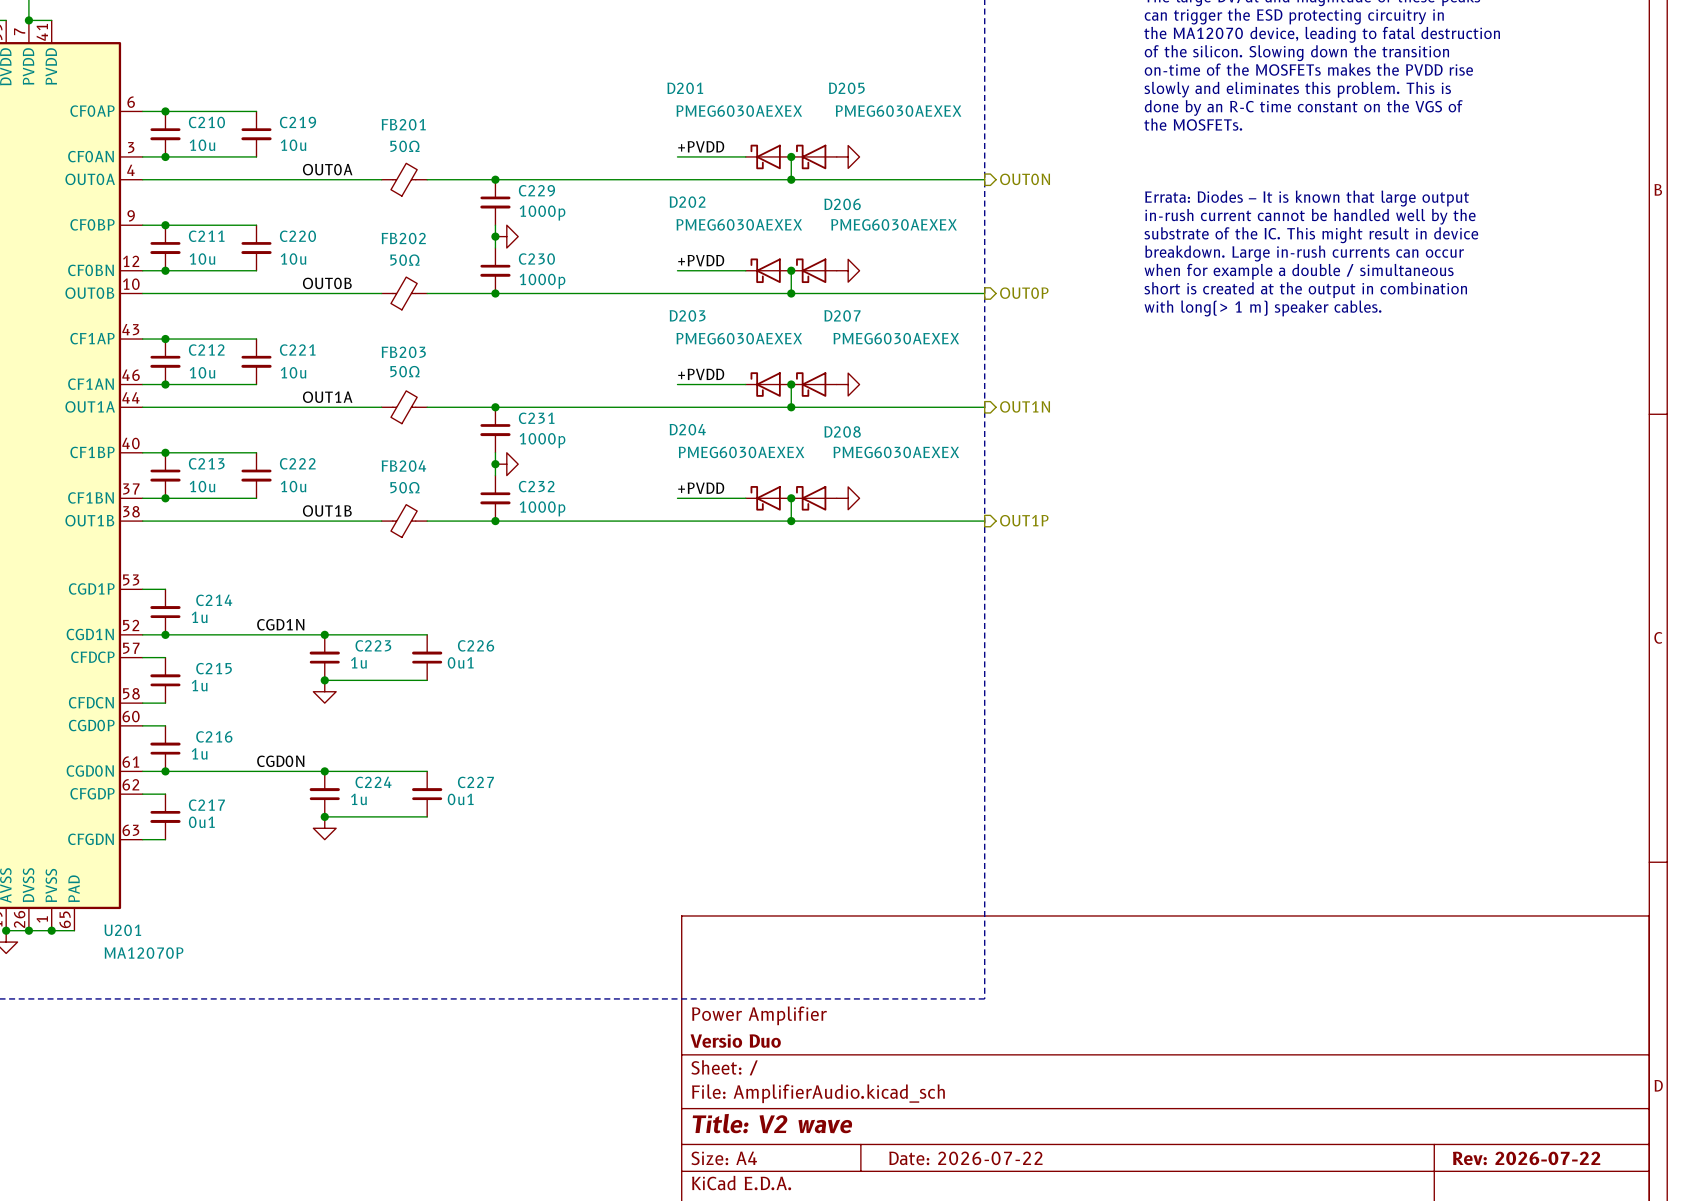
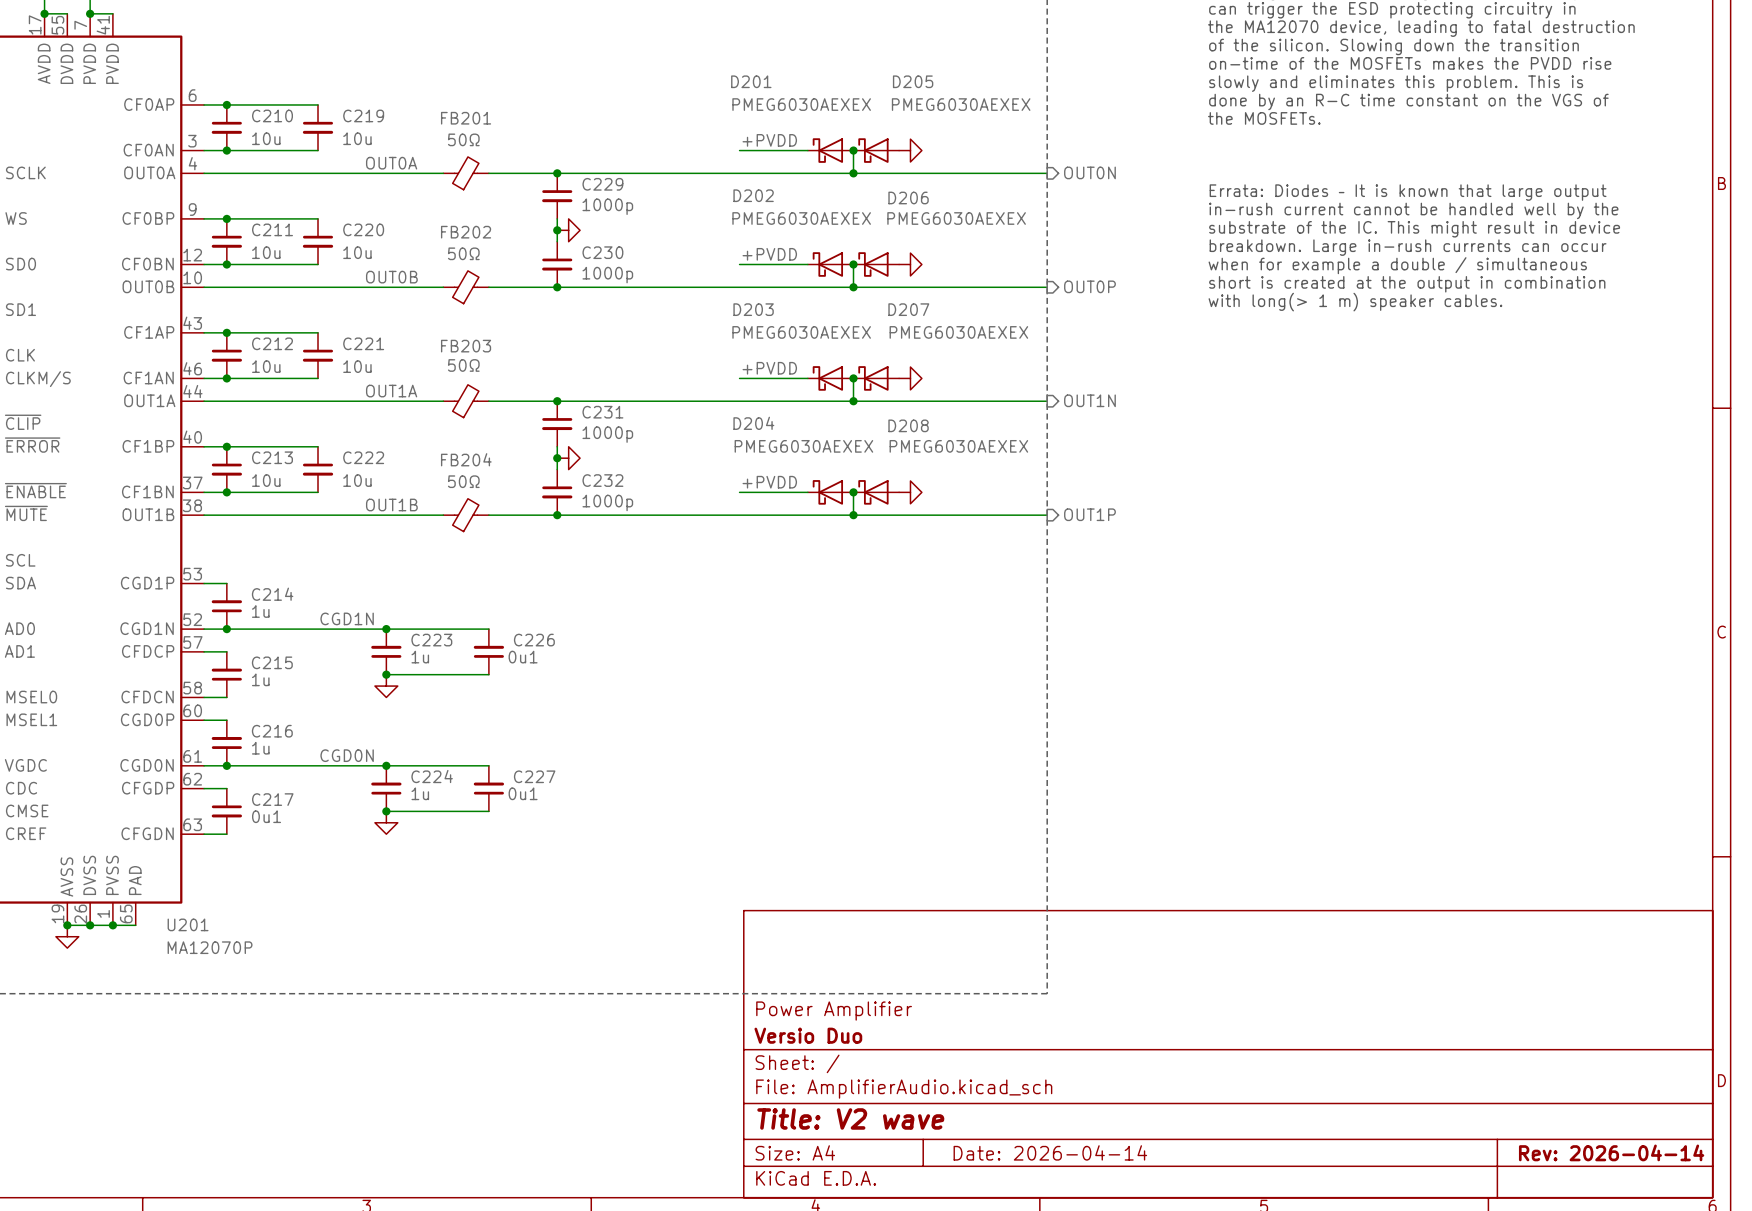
title block: Date: 2026-07-22 (965, 1158) -> Date: 2026-04-14 (1050, 1152)
title block: Rev: 2026-07-22 (1526, 1158) -> Rev: 2026-04-14 (1611, 1152)

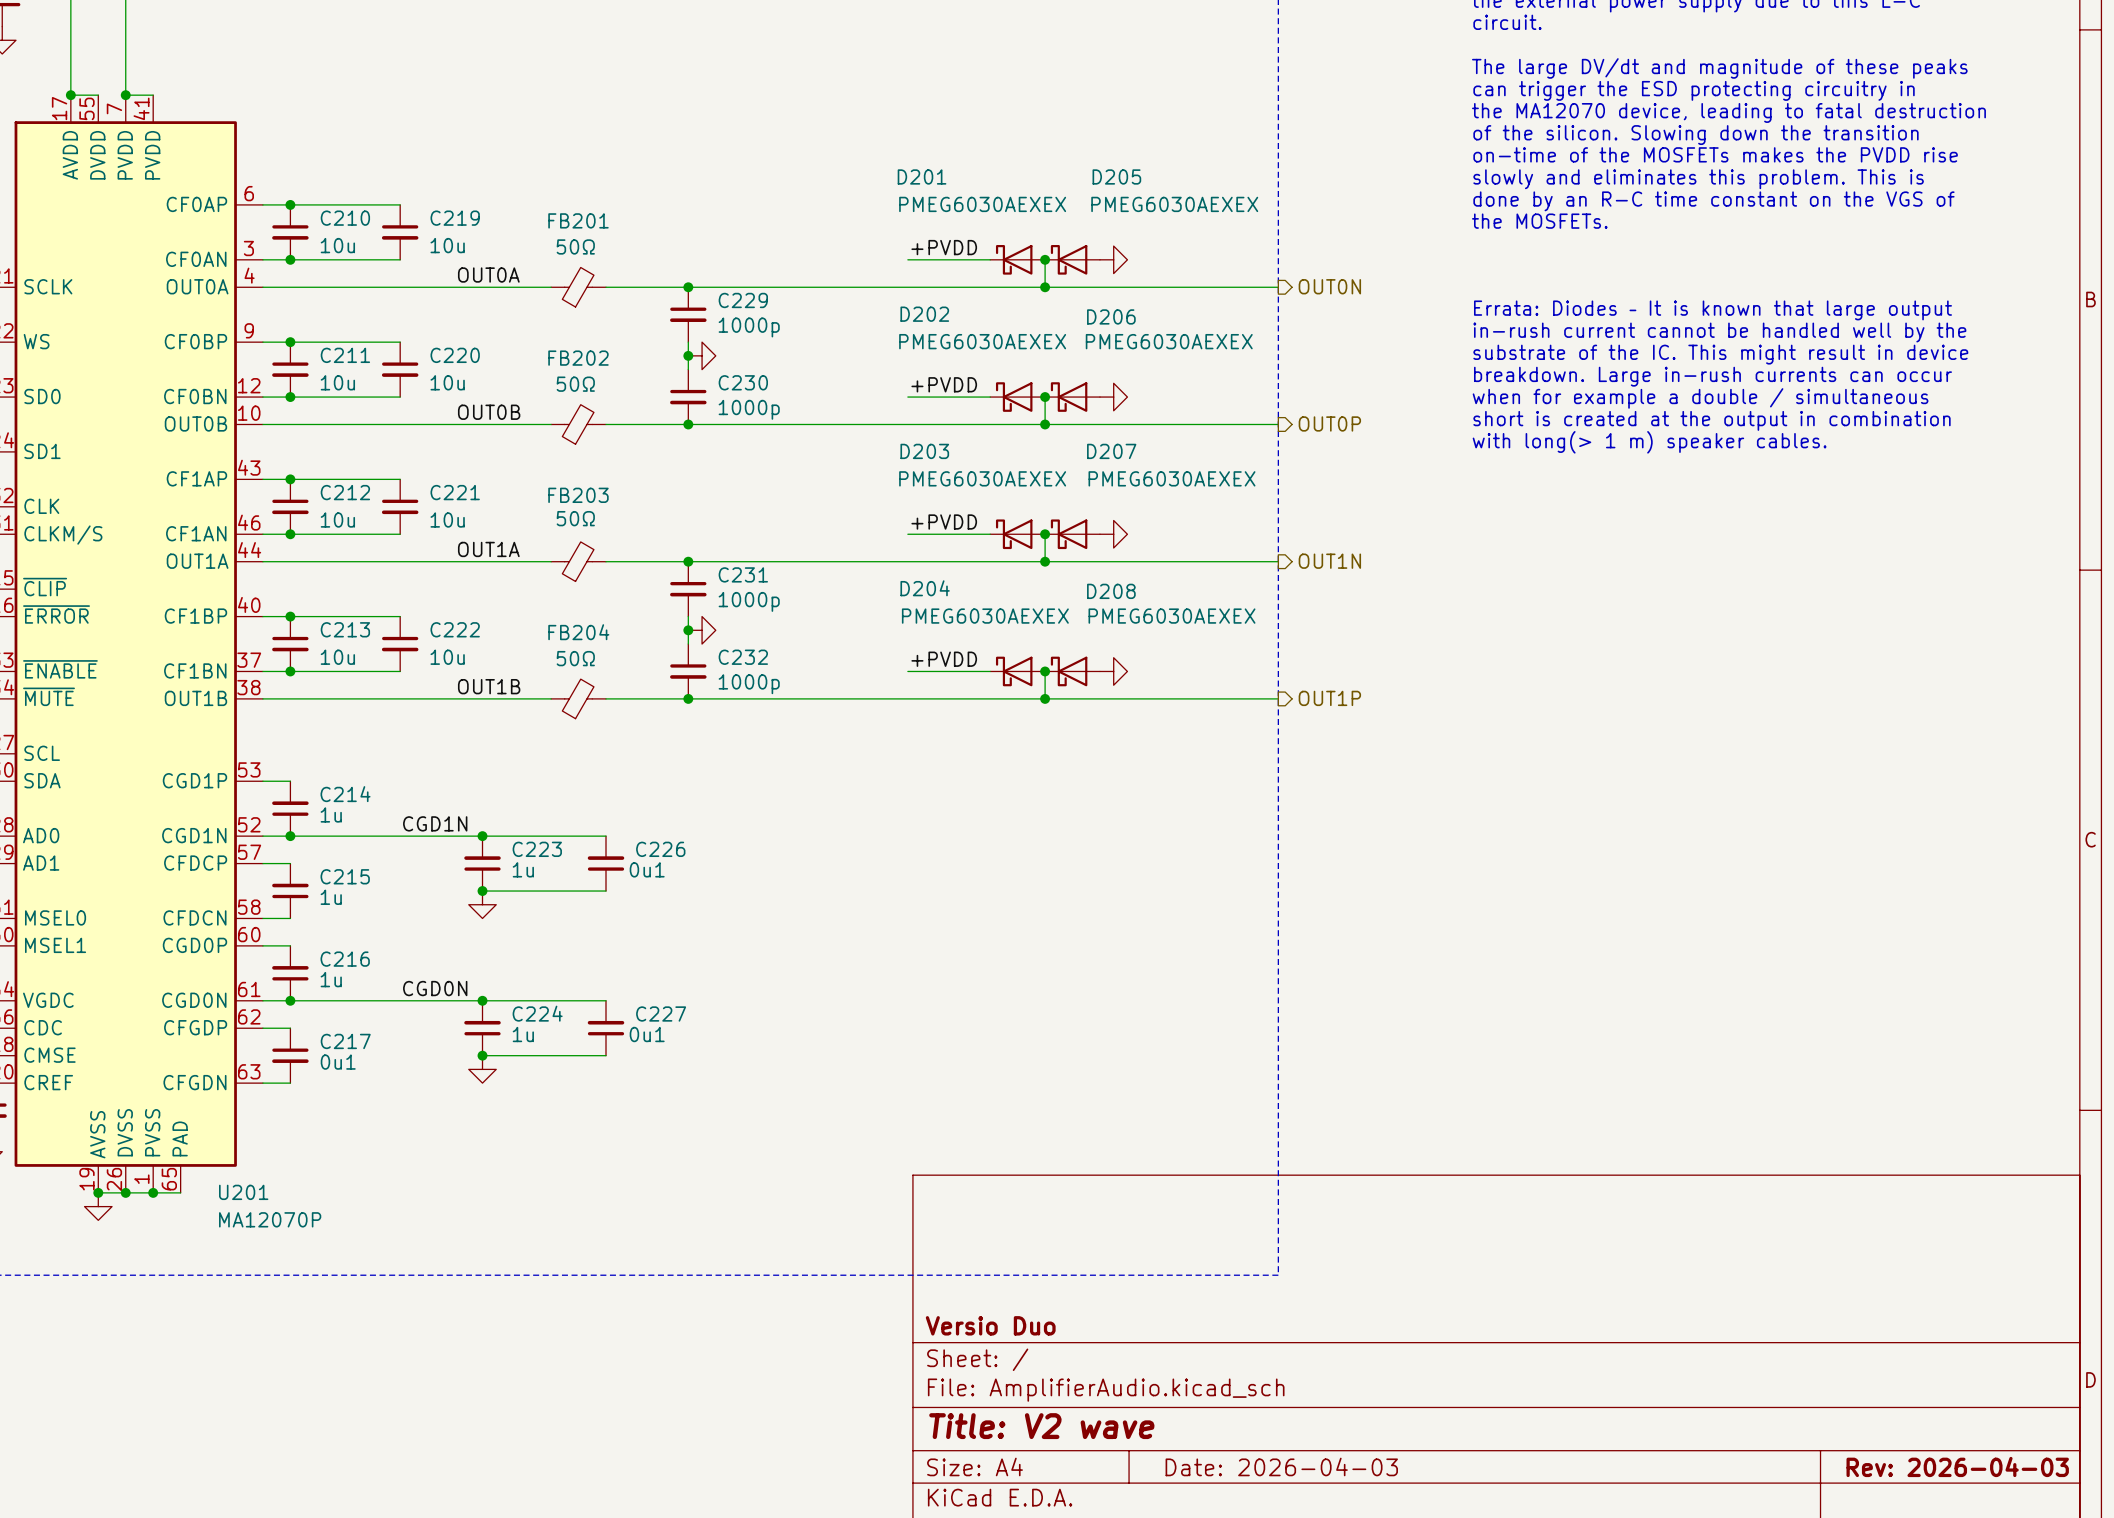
title block: Power Amplifier (834, 1011) -> none
title block: Date: 2026-04-14 (1050, 1152) -> Date: 2026-04-03 (1281, 1466)
title block: Rev: 2026-04-14 (1611, 1152) -> Rev: 2026-04-03 (1957, 1466)

